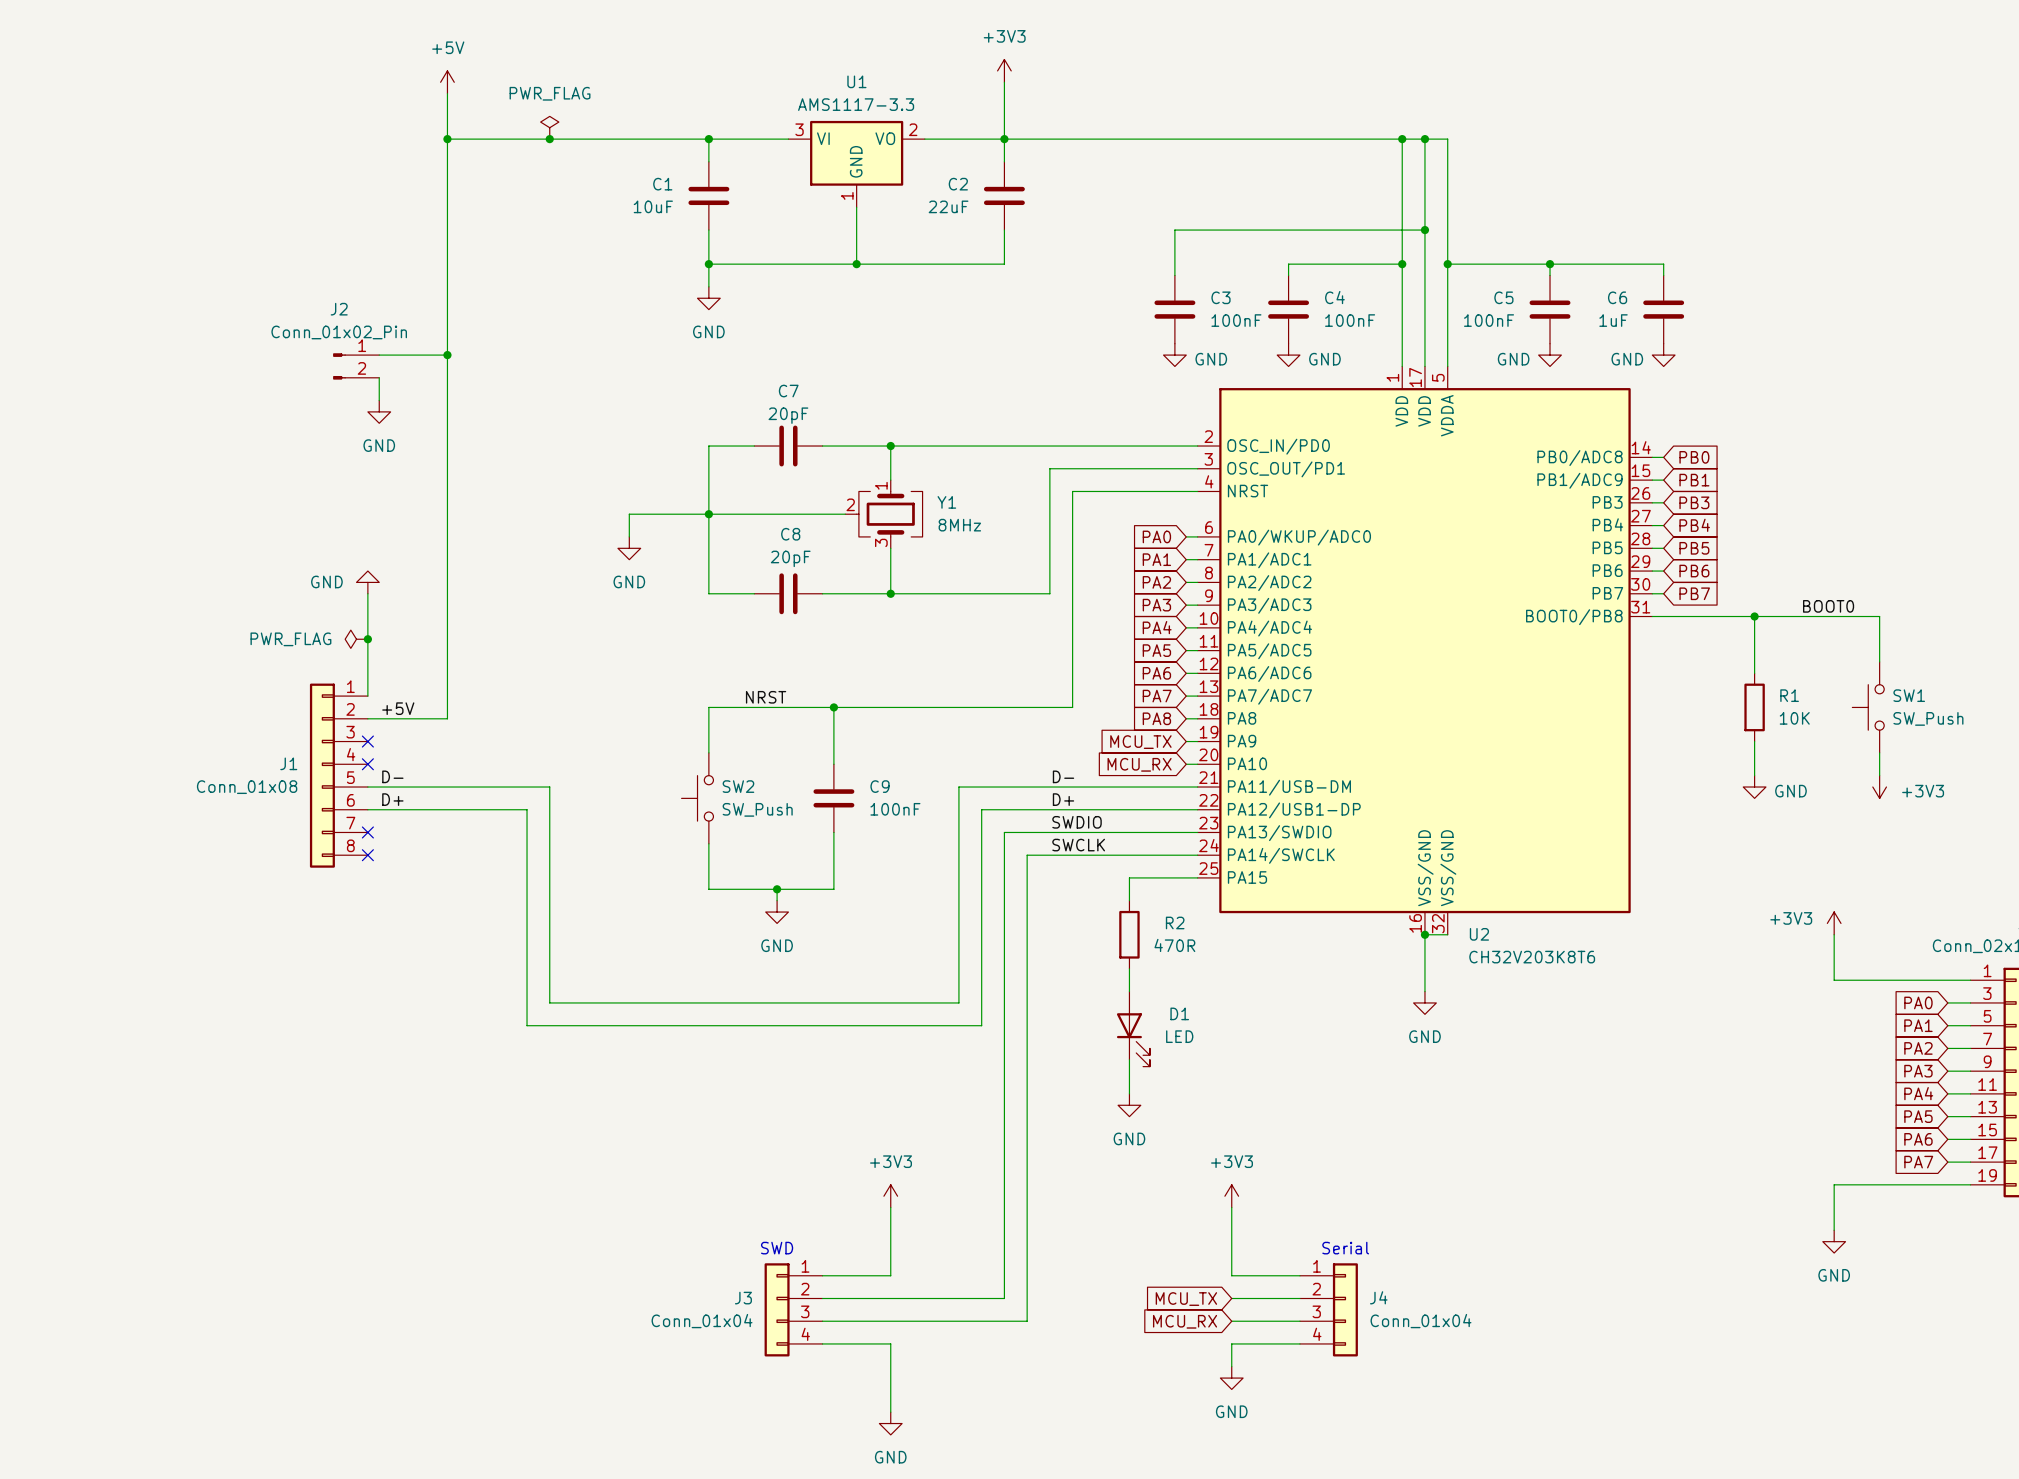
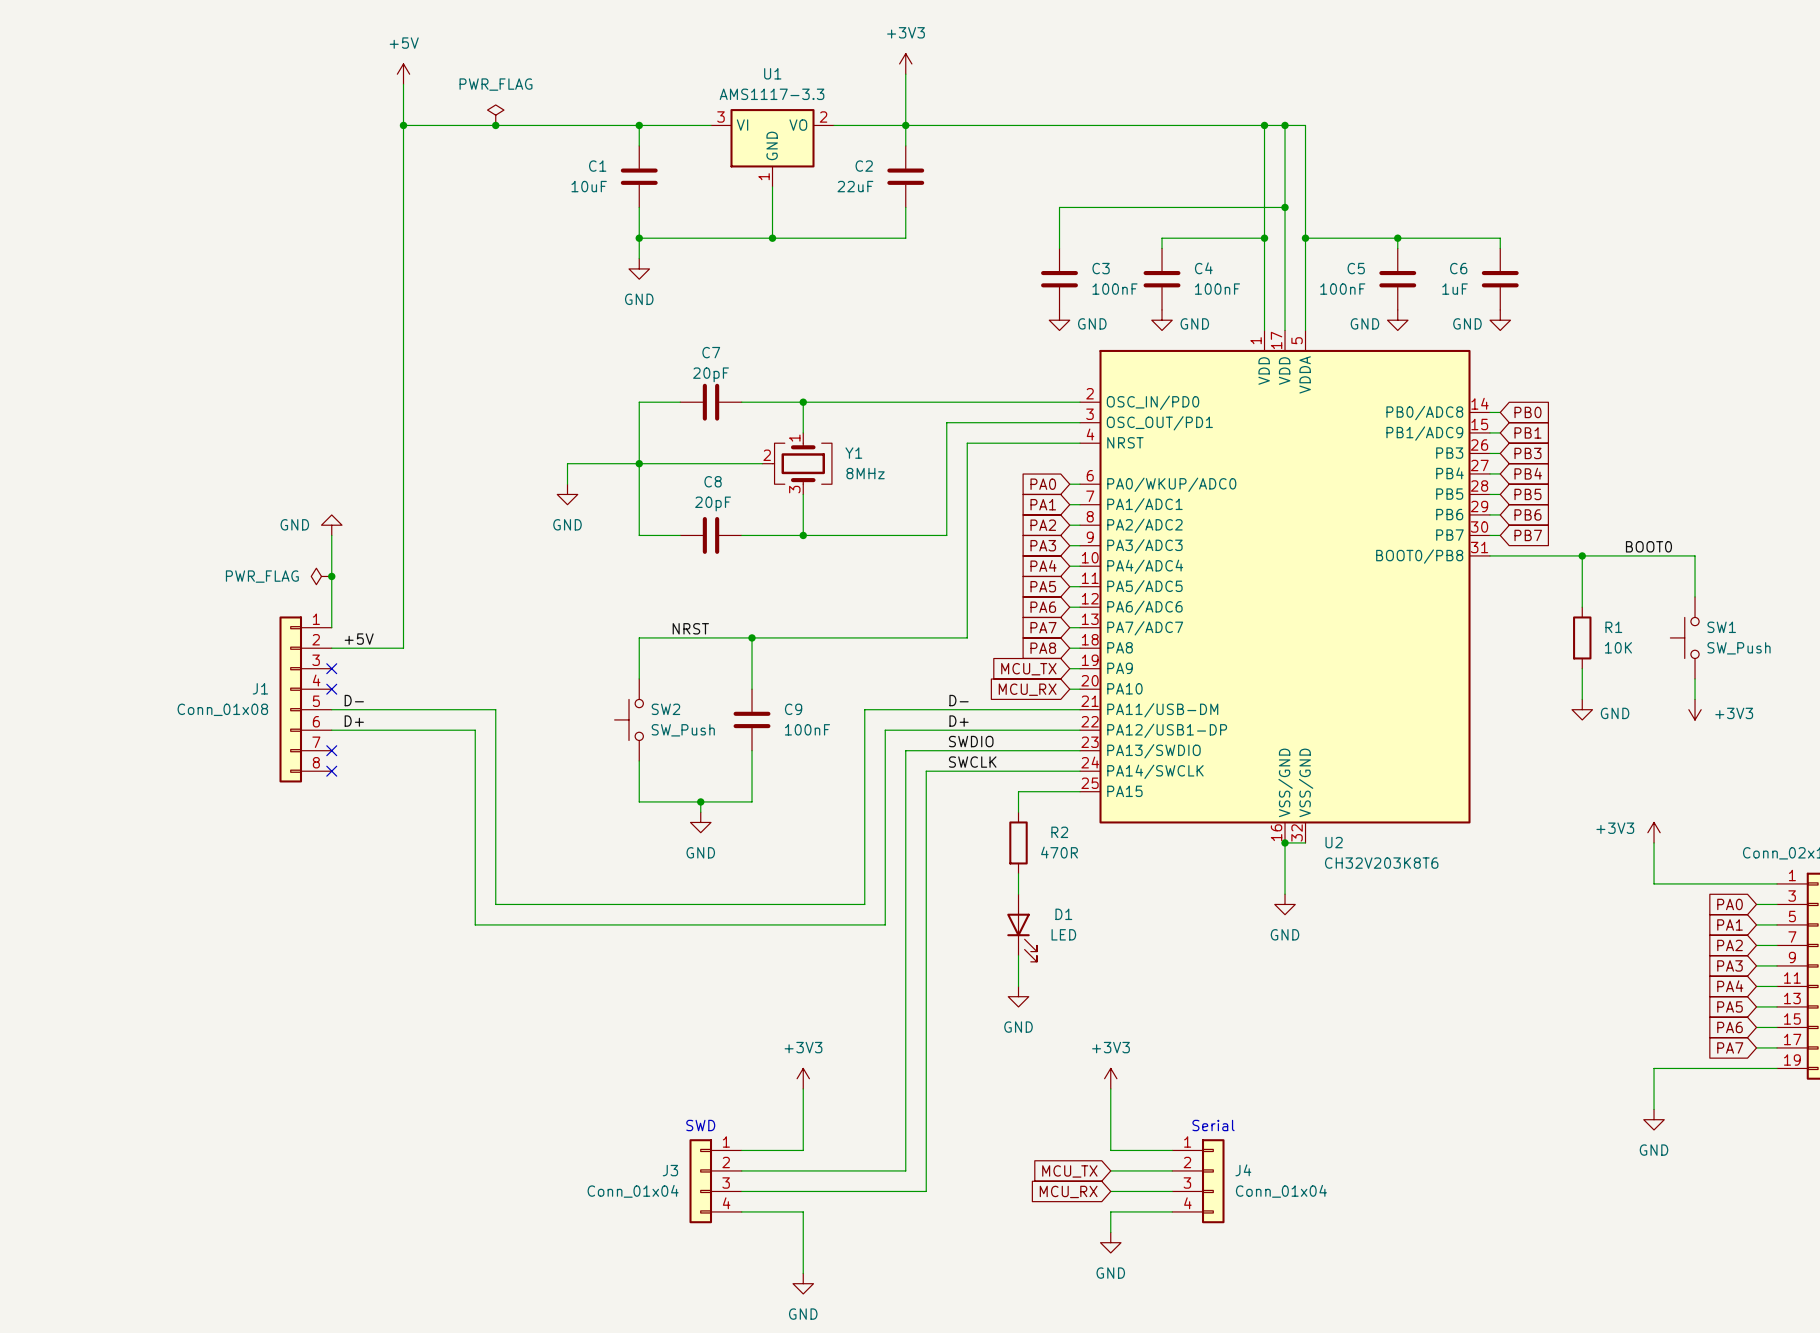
wire: (379, 355) (447, 355) -> none
junction: (447, 355) -> none
J2: Conn_01x02_Pin (356, 366) -> none
wire: (379, 377) (379, 400) -> none
power symbol: GND (379, 411) -> none

